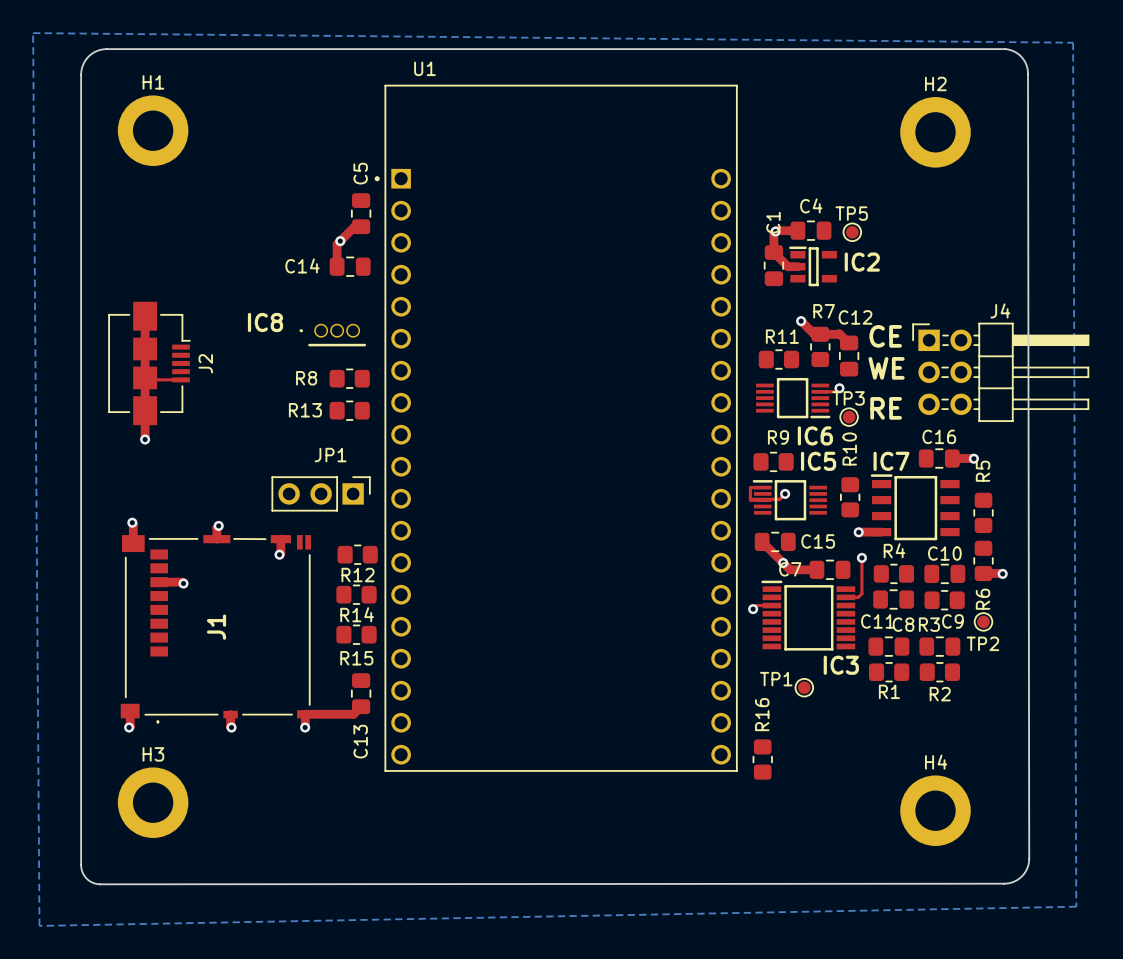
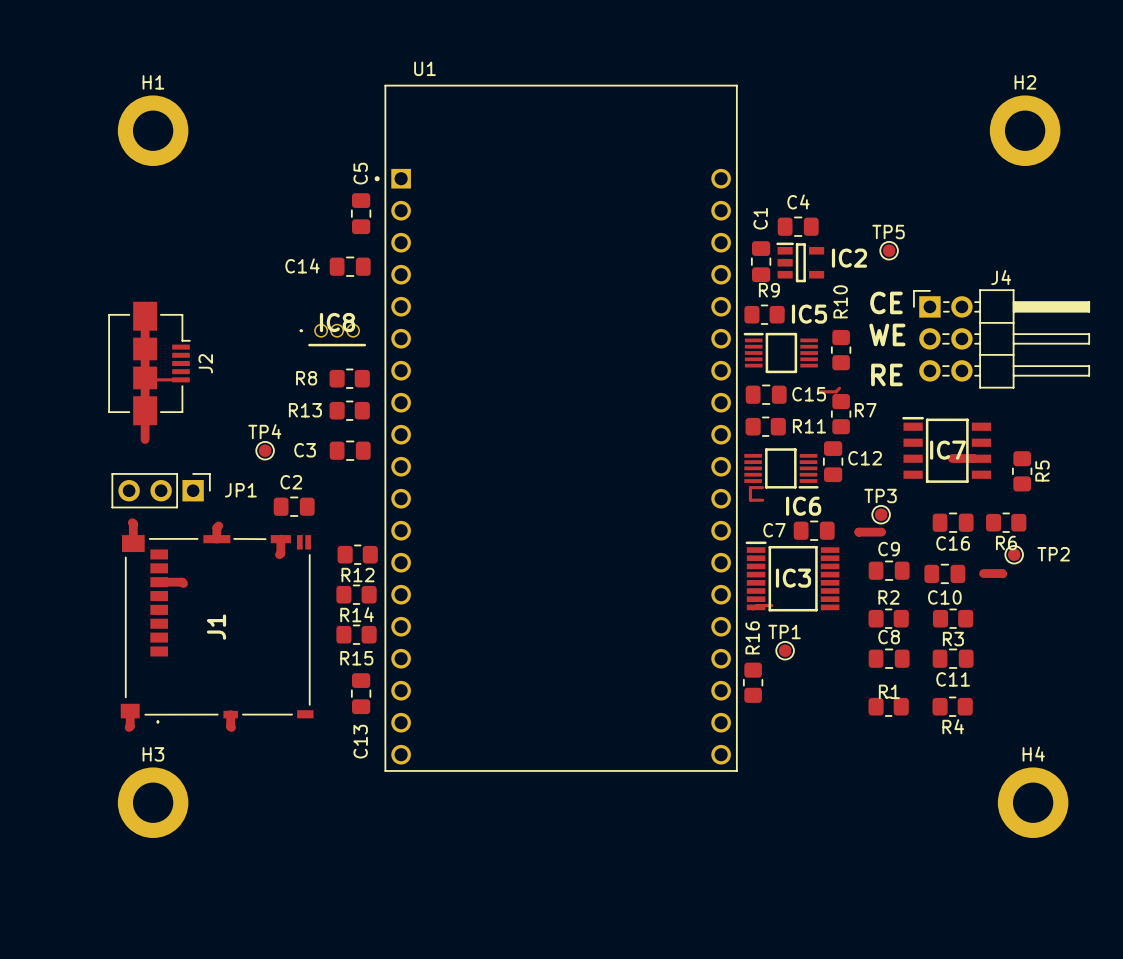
bottom zone outline: (33, 33) (1073, 42) (1076, 906) (39, 925) (33, 33) -> none
board edge: (106, 49) (1005, 49) (1019, 55) (1026, 65) (1028, 74) (1029, 858) (1027, 866) (1021, 876) (1015, 881) (1004, 883) (100, 884) (86, 878) (81, 865) (81, 74) (82, 66) (88, 56) (98, 50) (106, 49) -> none
H2 position: (935, 132) -> (1025, 130)
top track: (361, 226) (354, 226) (337, 244) (337, 266) -> none
top track: (797, 230) (776, 230) (773, 233) (773, 252) (788, 266) (797, 266) -> none
C4 position: (810, 230) -> (798, 226)
via: (775, 231) -> none
TP5 position: (852, 232) -> (889, 250)
via: (340, 241) -> none
C1 position: (773, 265) -> (761, 261)
IC2 position: (813, 266) -> (800, 262)
R7 name position: R7 (824, 311) -> R7 (865, 410)
C12 name position: C12 (855, 317) -> C12 (865, 458)
top track: (801, 321) (814, 334) (839, 333) (849, 342) -> none
via: (801, 321) -> none
IC8 name position: IC8 (265, 322) -> IC8 (337, 322)
R11 name position: R11 (782, 336) -> R11 (809, 426)
text position: CE (885, 336) -> CE (886, 302)
R7 position: (820, 346) -> (841, 414)
C12 position: (849, 356) -> (833, 461)
R11 position: (778, 359) -> (765, 426)
text position: WE (886, 368) -> WE (887, 334)
J4 position: (1000, 372) -> (1001, 338)
via: (839, 388) -> none
IC6 position: (793, 398) -> (781, 468)
text position: RE (886, 408) -> RE (886, 374)
TP3 position: (849, 417) -> (881, 514)
C16 name position: C16 (939, 436) -> C16 (953, 543)
via: (145, 439) -> none
TP4: none -> (265, 450)
C3: none -> (350, 450)
JP1 name position: JP1 (330, 455) -> JP1 (240, 490)
C16 position: (939, 458) -> (953, 522)
via: (973, 458) -> none
R9 position: (773, 461) -> (764, 314)
IC7 name position: IC7 (891, 461) -> IC7 (948, 450)
R5 name position: R5 (983, 471) -> R5 (1042, 471)
JP1 position: (321, 493) -> (161, 490)
top track: (785, 493) (779, 499) (750, 499) -> none
via: (785, 493) -> none
R10 position: (850, 497) -> (841, 350)
IC5 position: (789, 500) -> (780, 353)
C2: none -> (294, 506)
IC7 position: (915, 507) -> (946, 449)
R5 position: (983, 512) -> (1022, 471)
via: (132, 522) -> none
via: (218, 525) -> none
via: (858, 532) -> none
top track: (762, 541) (790, 569) (816, 569) -> none
C15 position: (775, 541) -> (766, 394)
R4 name position: R4 (894, 550) -> R4 (953, 726)
C10 name position: C10 (944, 553) -> C10 (944, 597)
via: (279, 554) -> none
top track: (861, 557) (861, 593) (858, 597) (845, 597) -> none
via: (861, 557) -> none
R6 rotation: 0° (983, 560) -> 90° clockwise (1006, 522)
R6 position: (983, 560) -> (1006, 522)
via: (783, 562) -> none
C7 position: (829, 569) -> (814, 530)
R4 position: (893, 573) -> (952, 706)
via: (1002, 573) -> none
via: (183, 583) -> none
C11 position: (893, 599) -> (953, 658)
R3 position: (944, 600) -> (953, 618)
via: (753, 609) -> none
IC3 position: (808, 615) -> (792, 576)
C11 name position: C11 (877, 621) -> C11 (953, 679)
C9 name position: C9 (952, 621) -> C9 (889, 549)
TP2 position: (983, 621) -> (1014, 554)
C8 name position: C8 (903, 624) -> C8 (889, 637)
R3 name position: R3 (929, 624) -> R3 (953, 639)
TP2 name position: TP2 (982, 643) -> TP2 (1053, 554)
C8 position: (888, 646) -> (889, 658)
C9 position: (939, 646) -> (889, 570)
IC3 name position: IC3 (841, 665) -> IC3 (793, 578)
R1 position: (889, 672) -> (888, 706)
R2 position: (939, 672) -> (888, 618)
TP1 name position: TP1 (776, 679) -> TP1 (784, 632)
TP1 position: (804, 687) -> (785, 650)
R2 name position: R2 (940, 694) -> R2 (888, 597)
top track: (361, 706) (353, 714) (305, 714) (305, 727) -> none
via: (129, 727) -> none
via: (231, 727) -> none
via: (305, 727) -> none
R16 position: (762, 759) -> (753, 682)
H4 position: (935, 810) -> (1033, 802)

